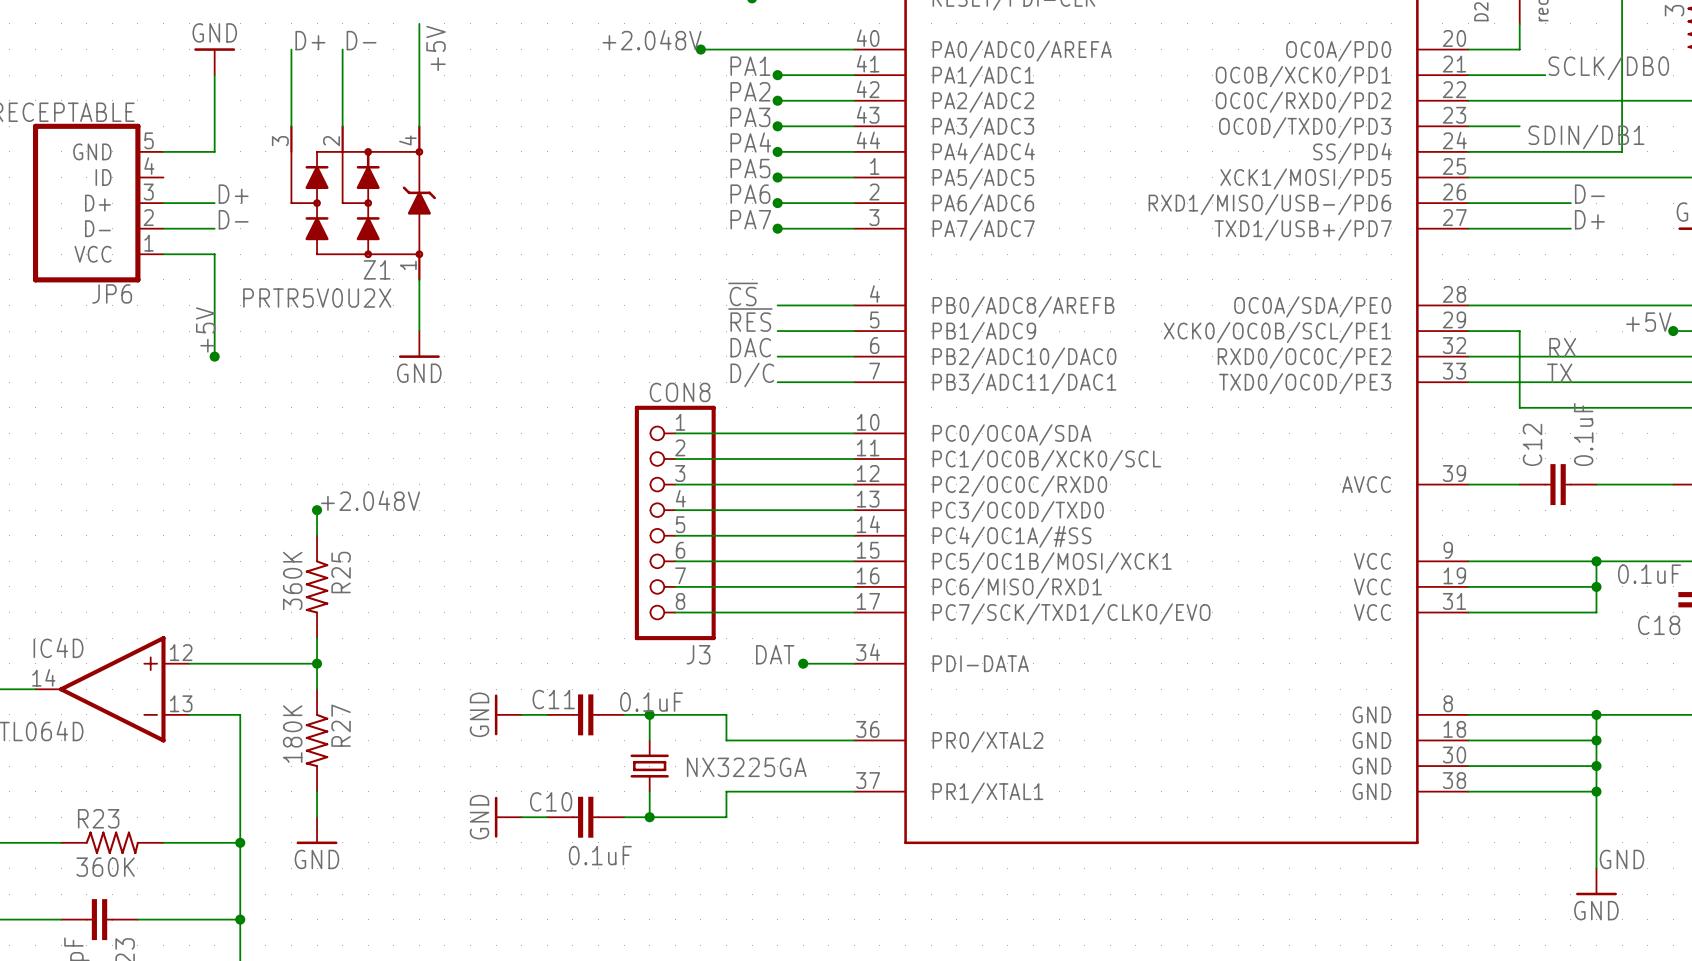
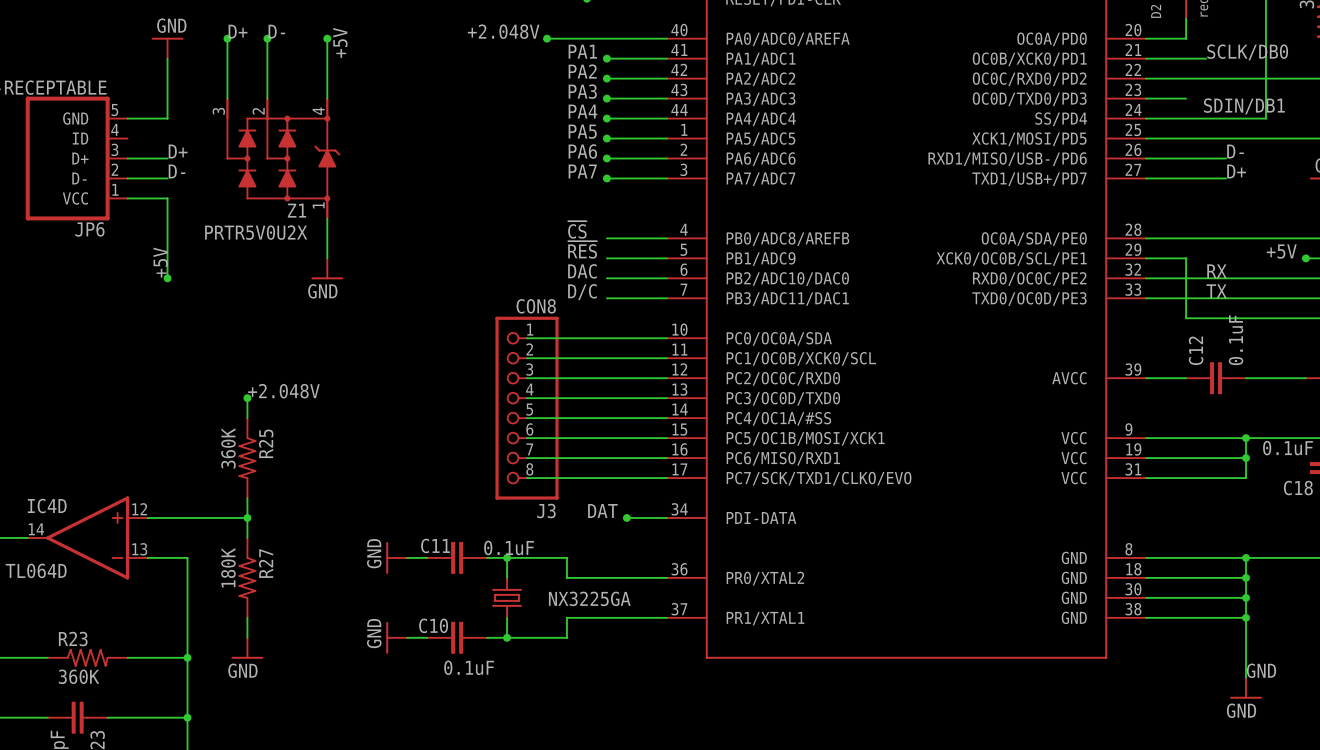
wire: (419, 23) (419, 49) -> none
junction: none -> (227, 38)
junction: none -> (267, 38)
junction: none -> (327, 38)

